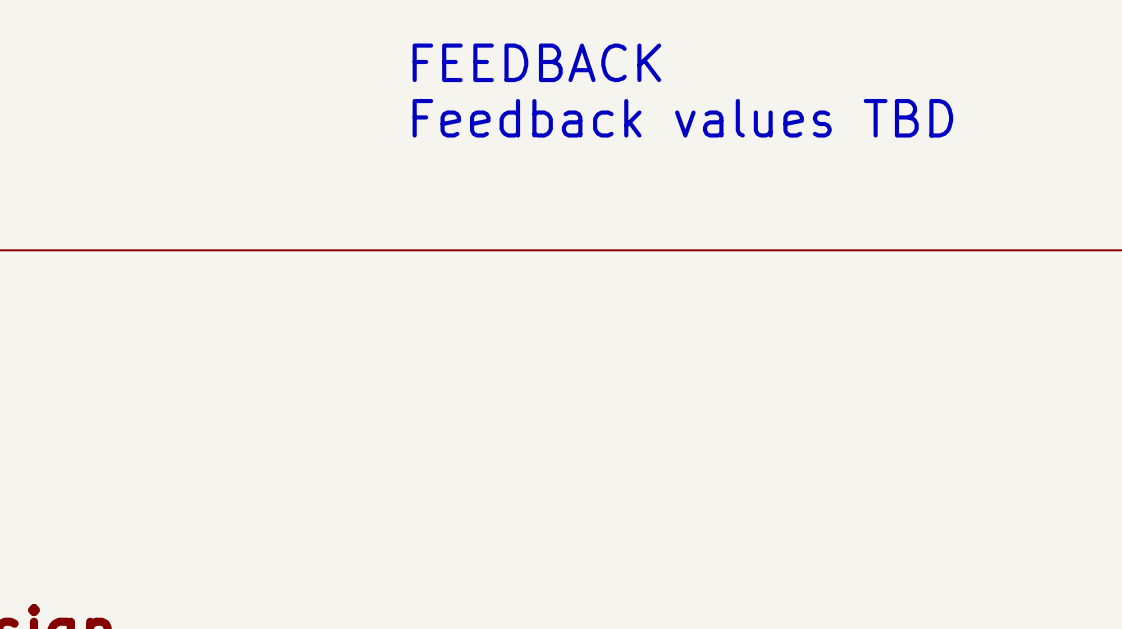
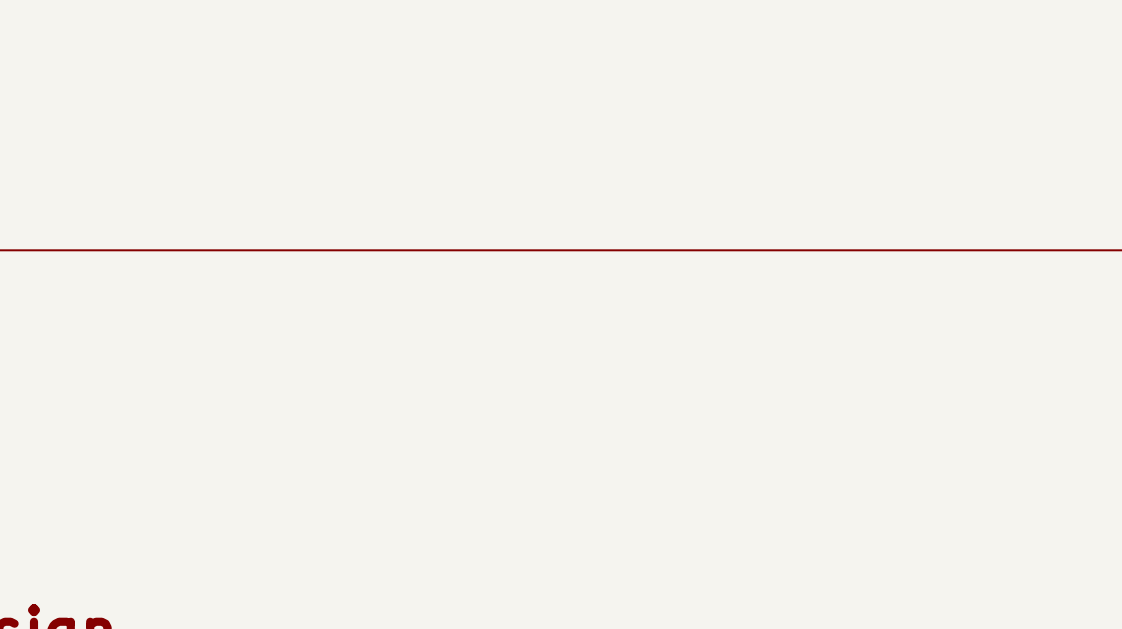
text: FEEDBACK (536, 62) -> none
text: Feedback values TBD (682, 118) -> none

